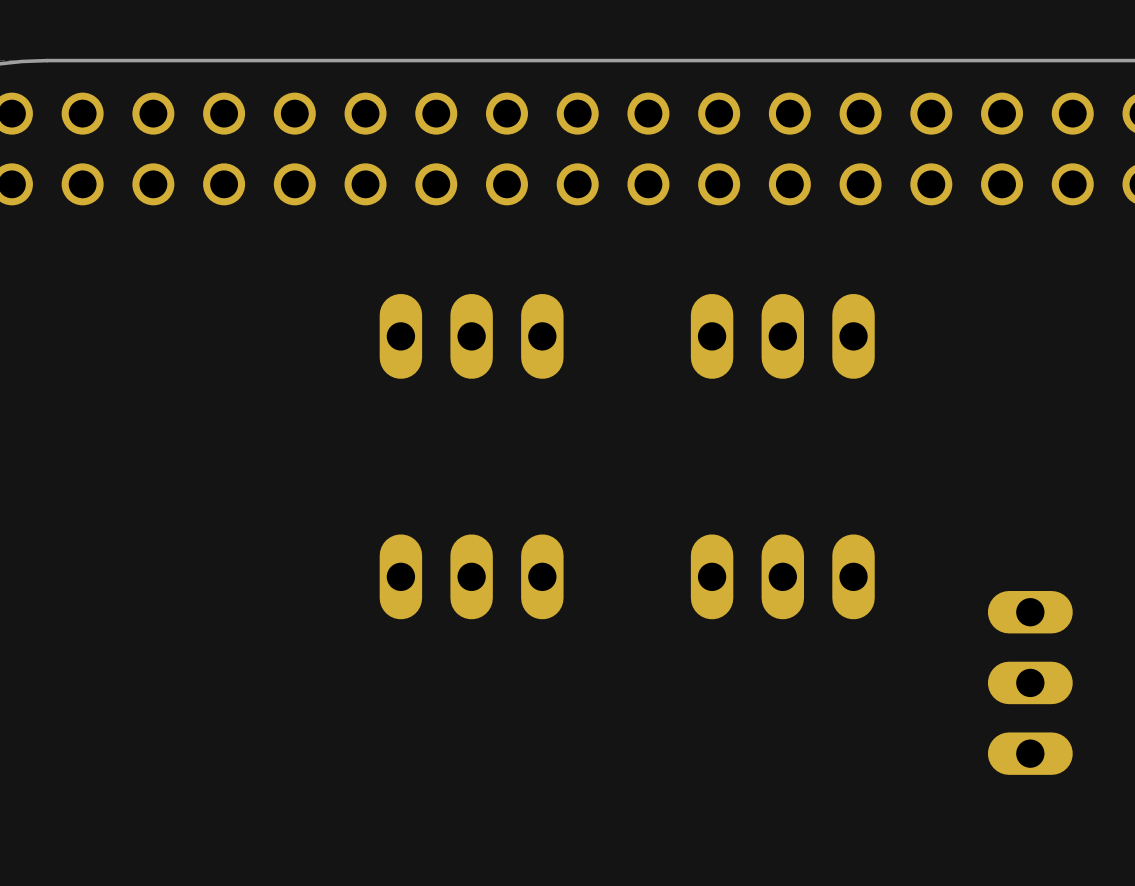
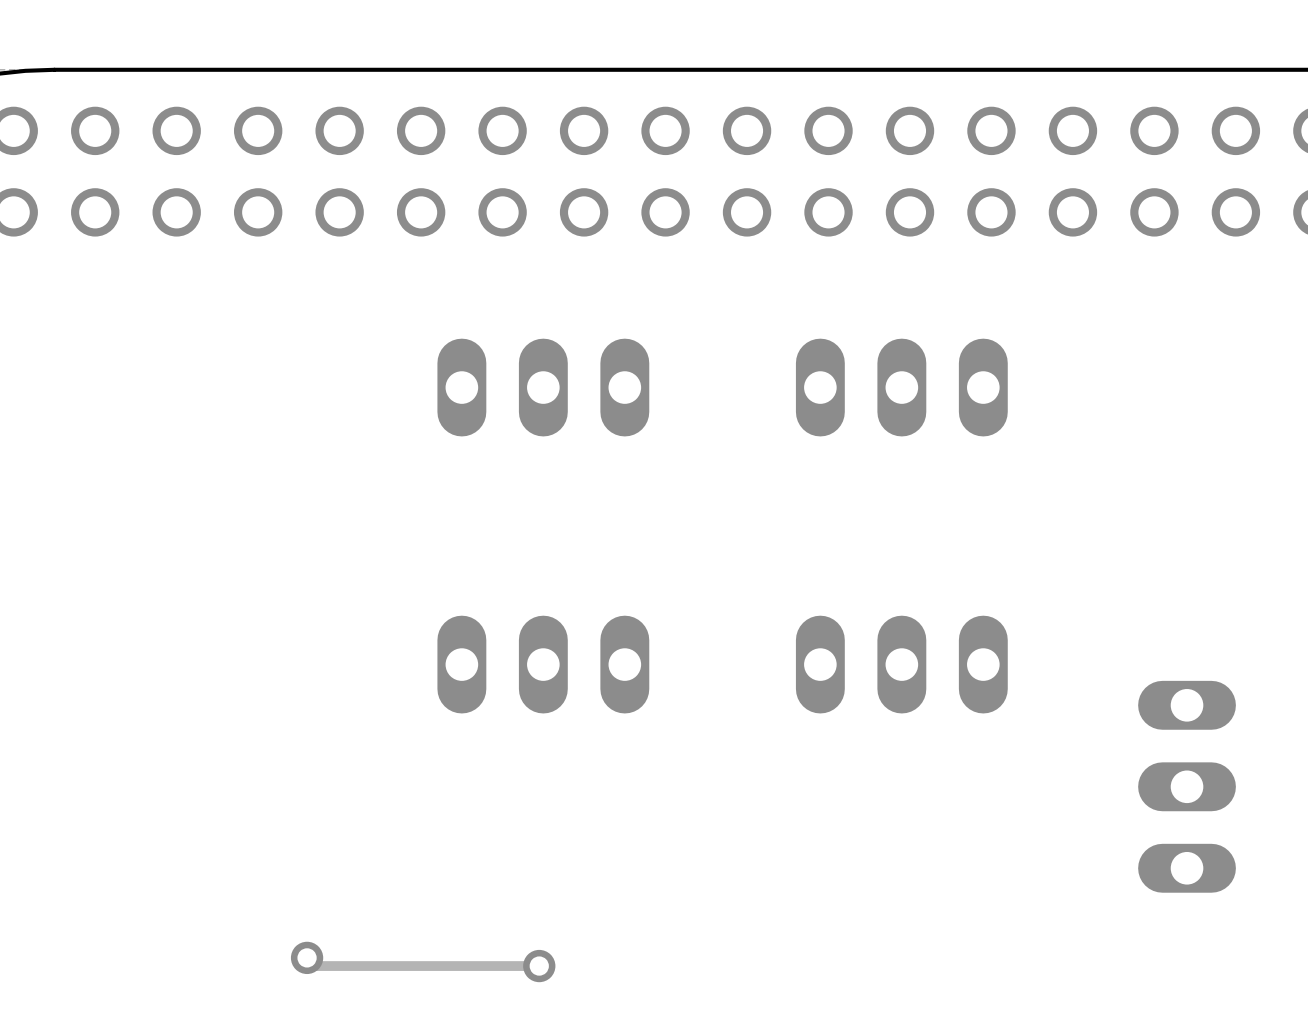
track: none -> (307, 957) (315, 966) (539, 966)
via: none -> (307, 957)
via: none -> (539, 966)

